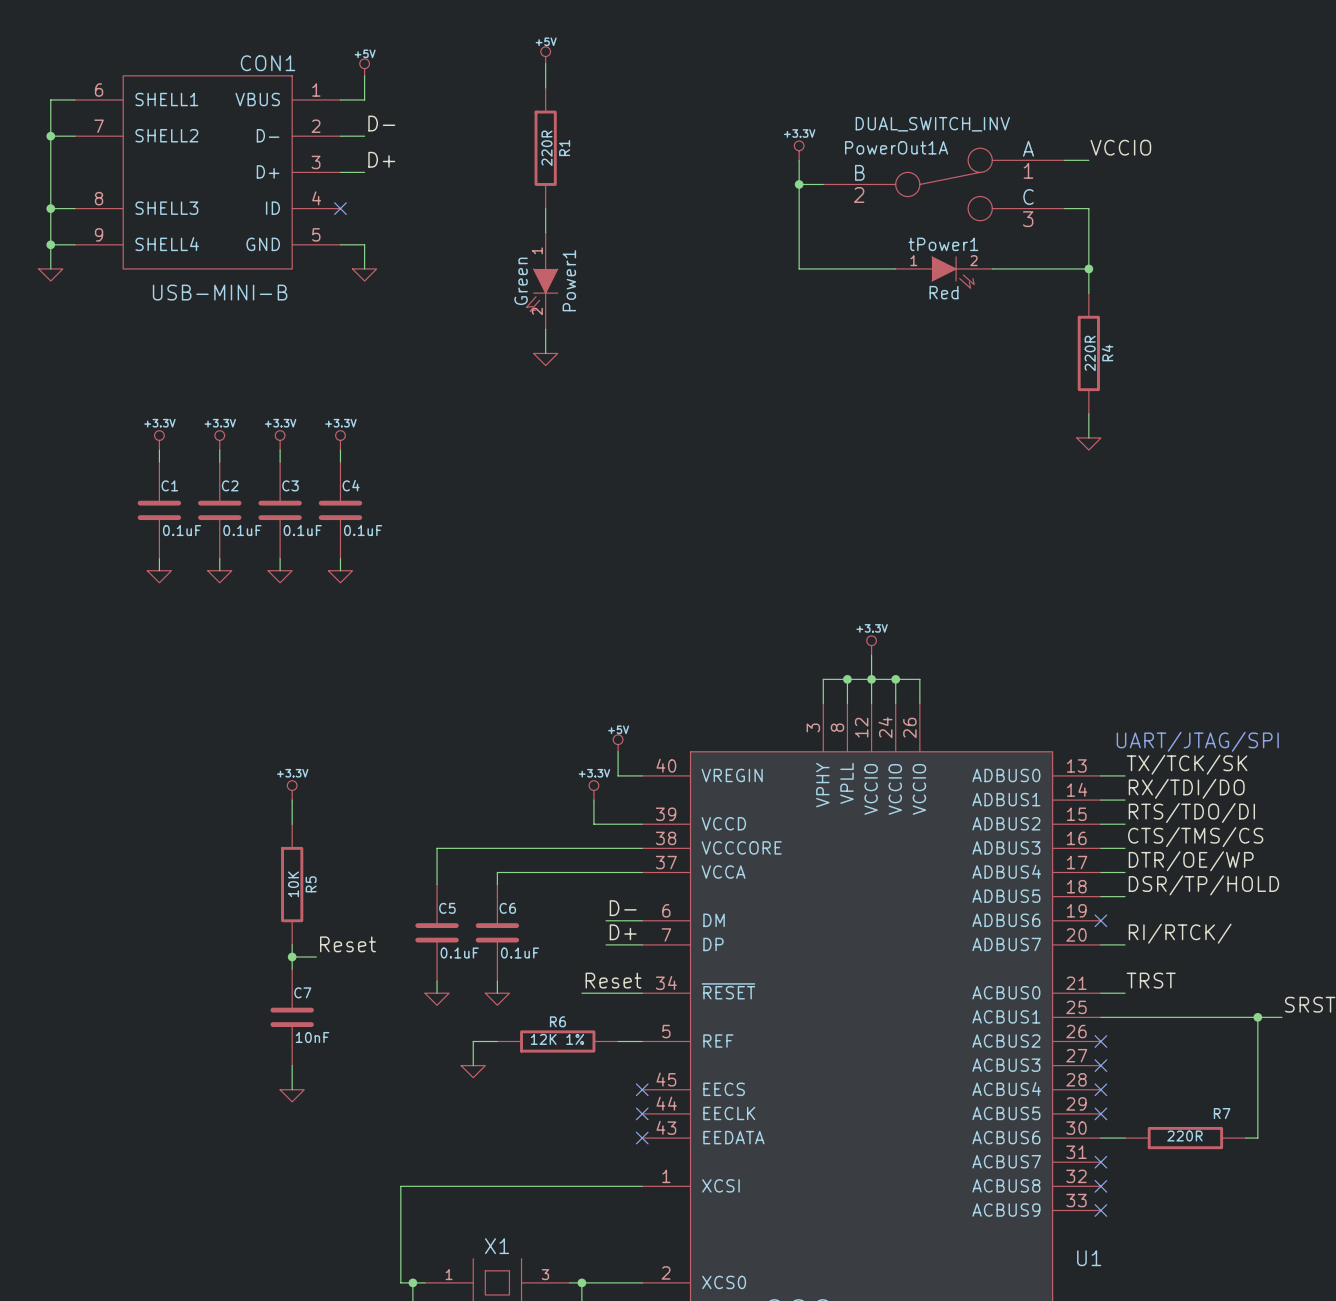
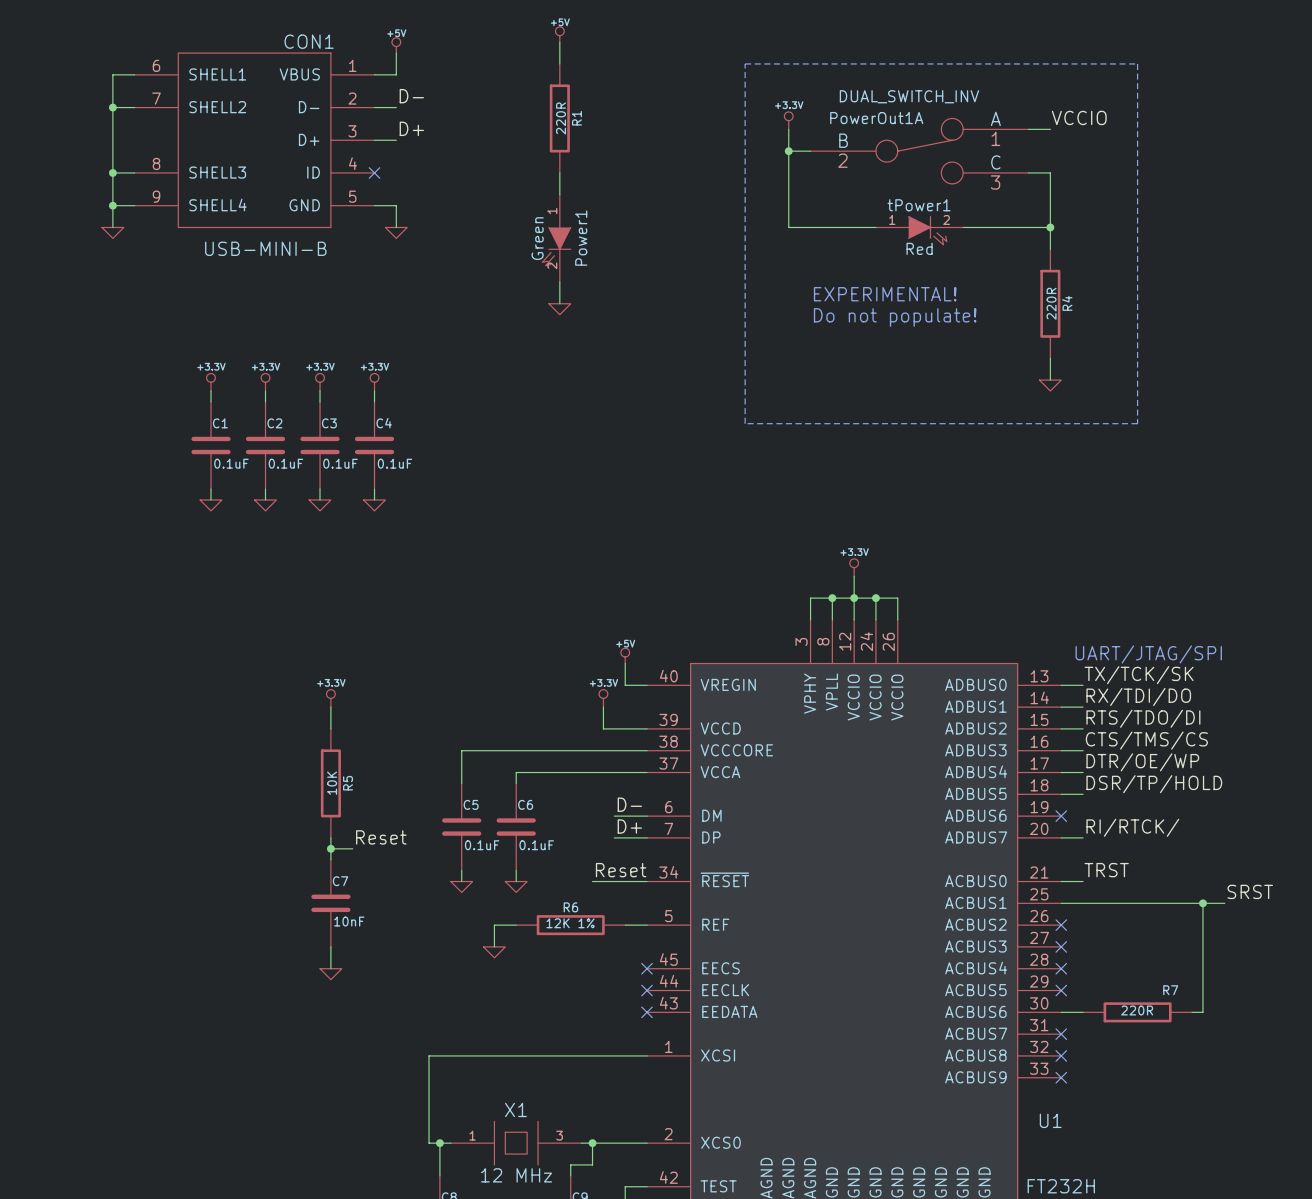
line: none -> (745, 63) (1137, 63) (1137, 423) (745, 423) (745, 63)
text: none -> EXPERIMENTAL! (885, 294)
text: none -> Do not populate! (895, 317)

